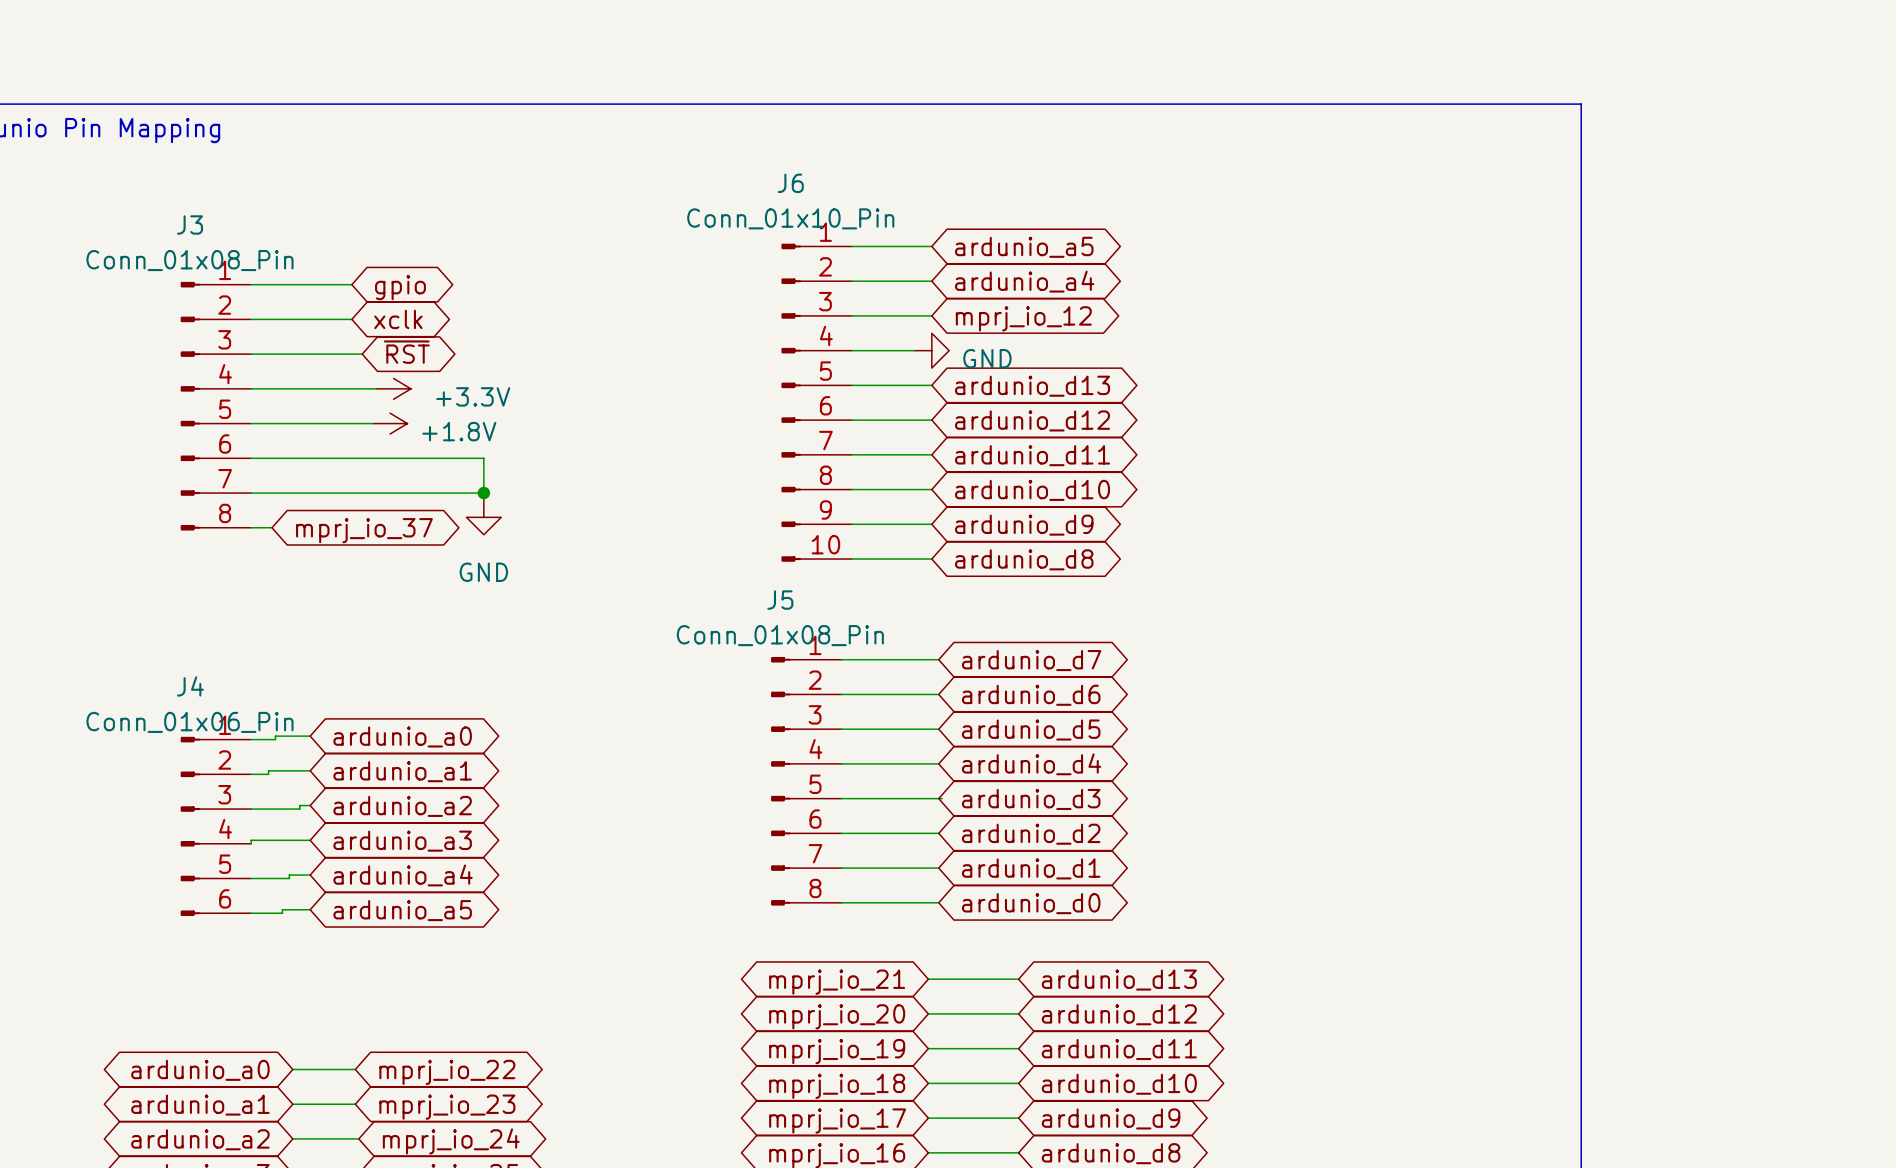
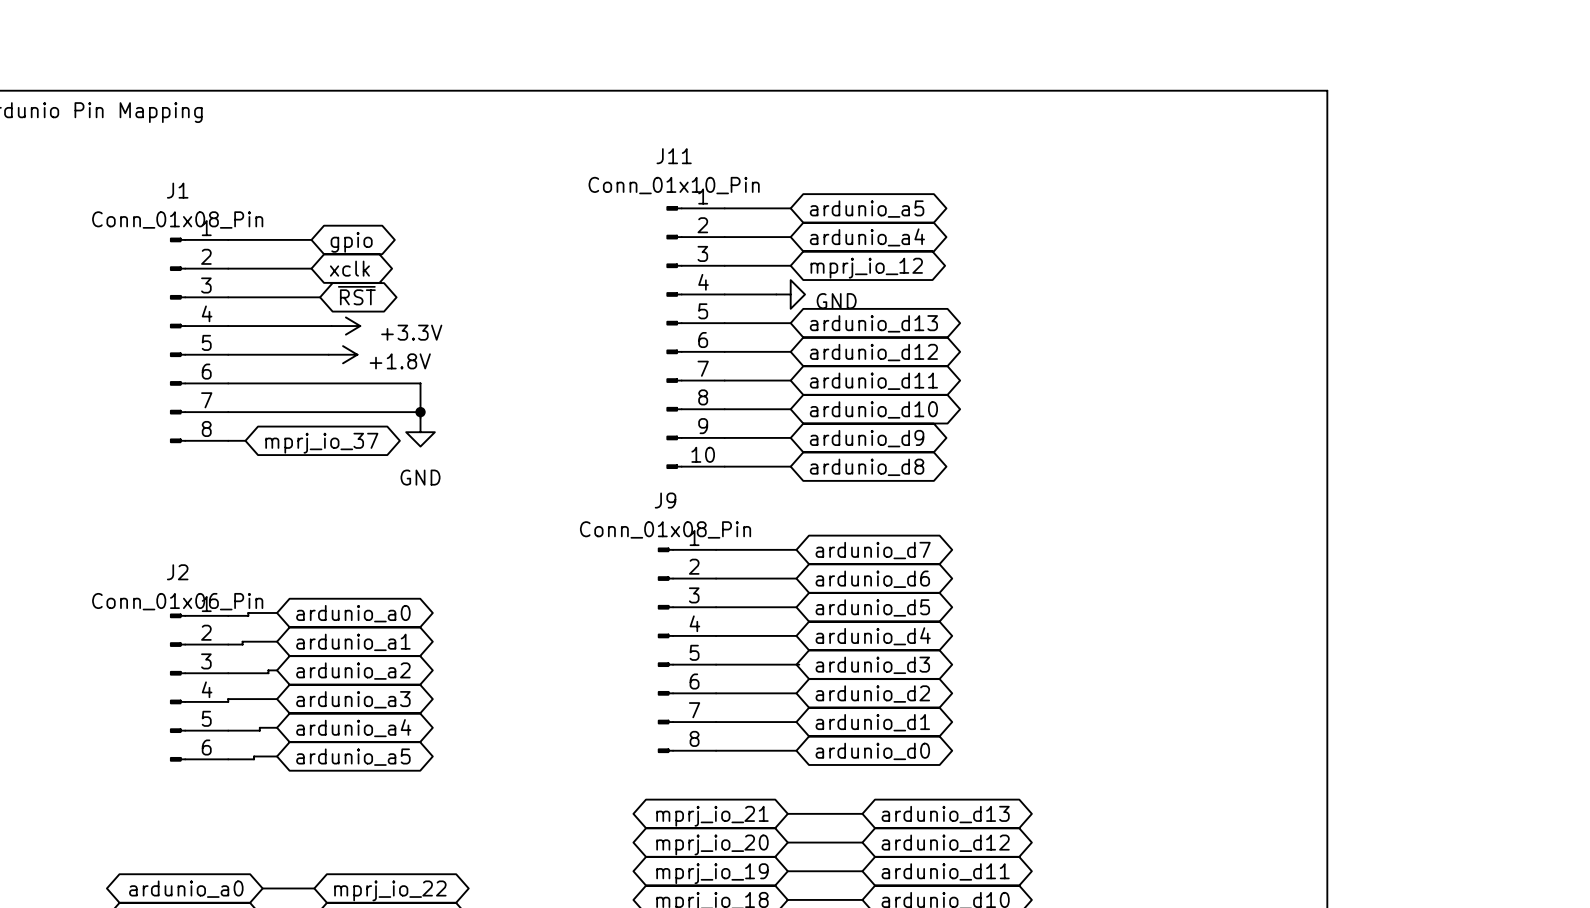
J6 name: J6 (790, 183) -> J11 (674, 156)
J3 name: J3 (189, 224) -> J1 (177, 190)
J5 name: J5 (780, 600) -> J9 (665, 500)
J4 name: J4 (190, 686) -> J2 (177, 572)

